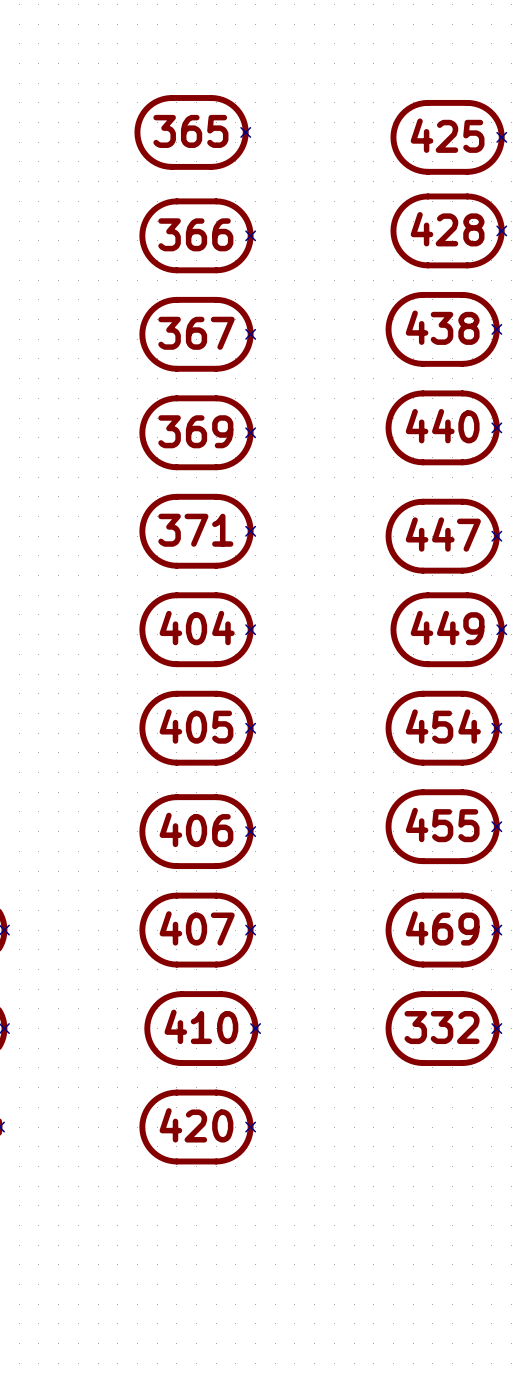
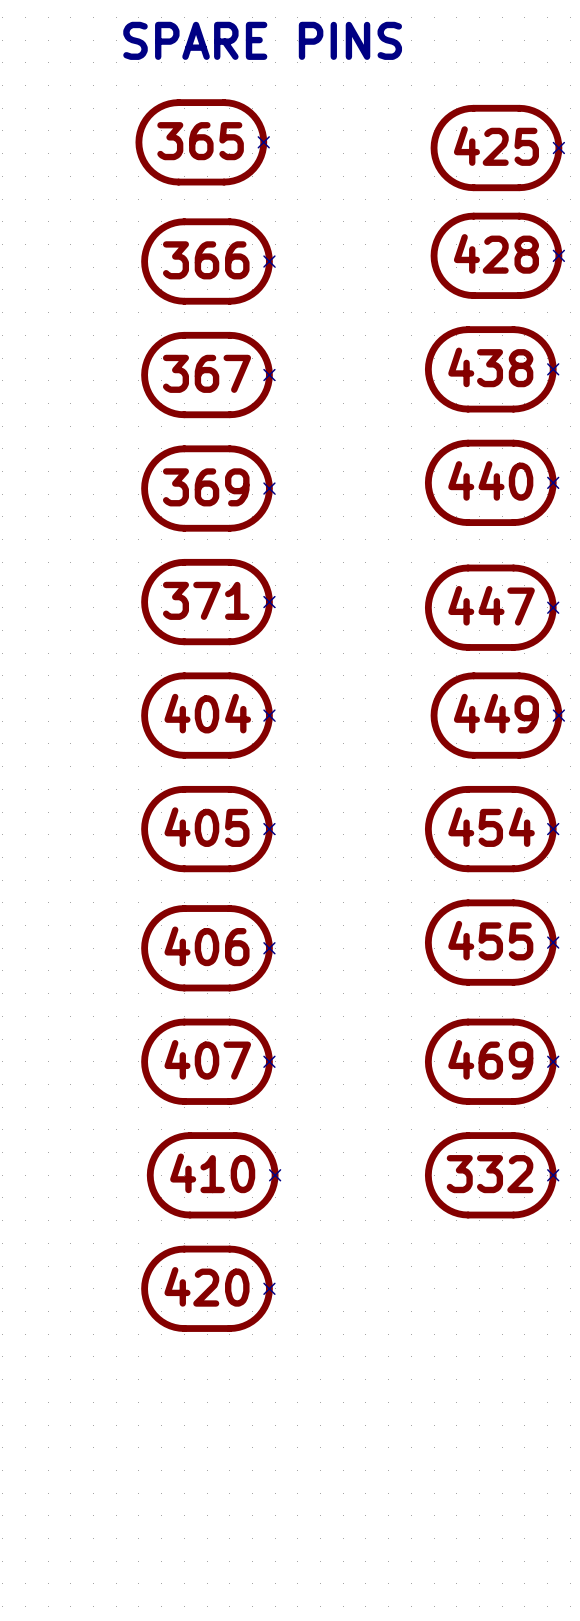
text: none -> SPARE PINS (262, 40)

